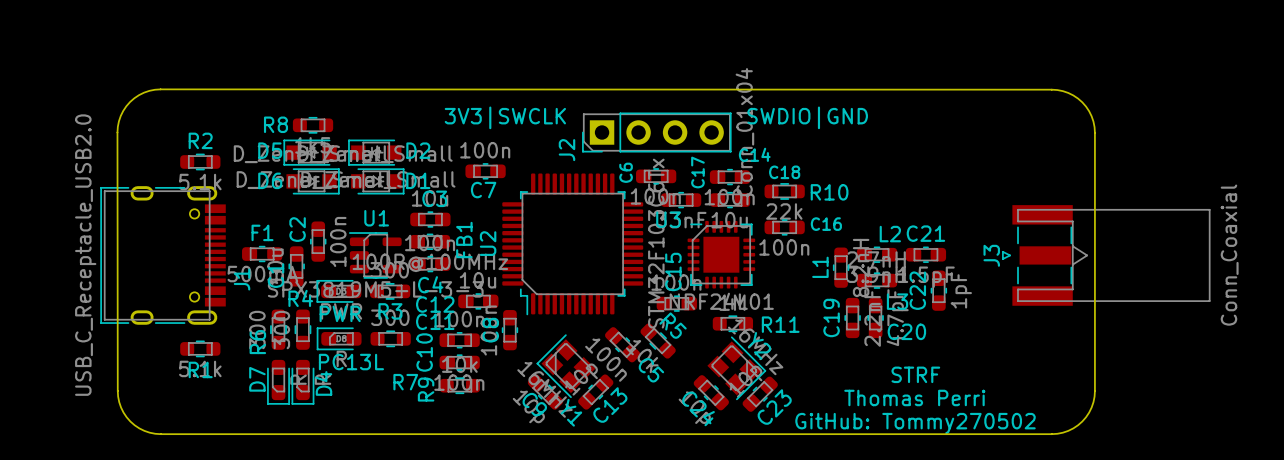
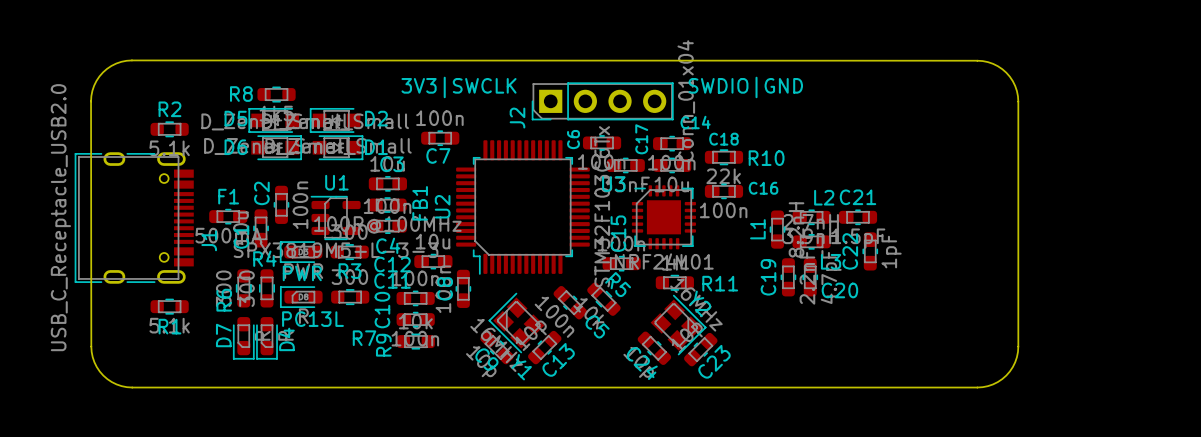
J3: Conn_Coaxial (1106, 255) -> none
text: STRF (915, 374) -> none
text: Thomas Perri (914, 397) -> none
text: GitHub: Tommy270502 (915, 423) -> none

